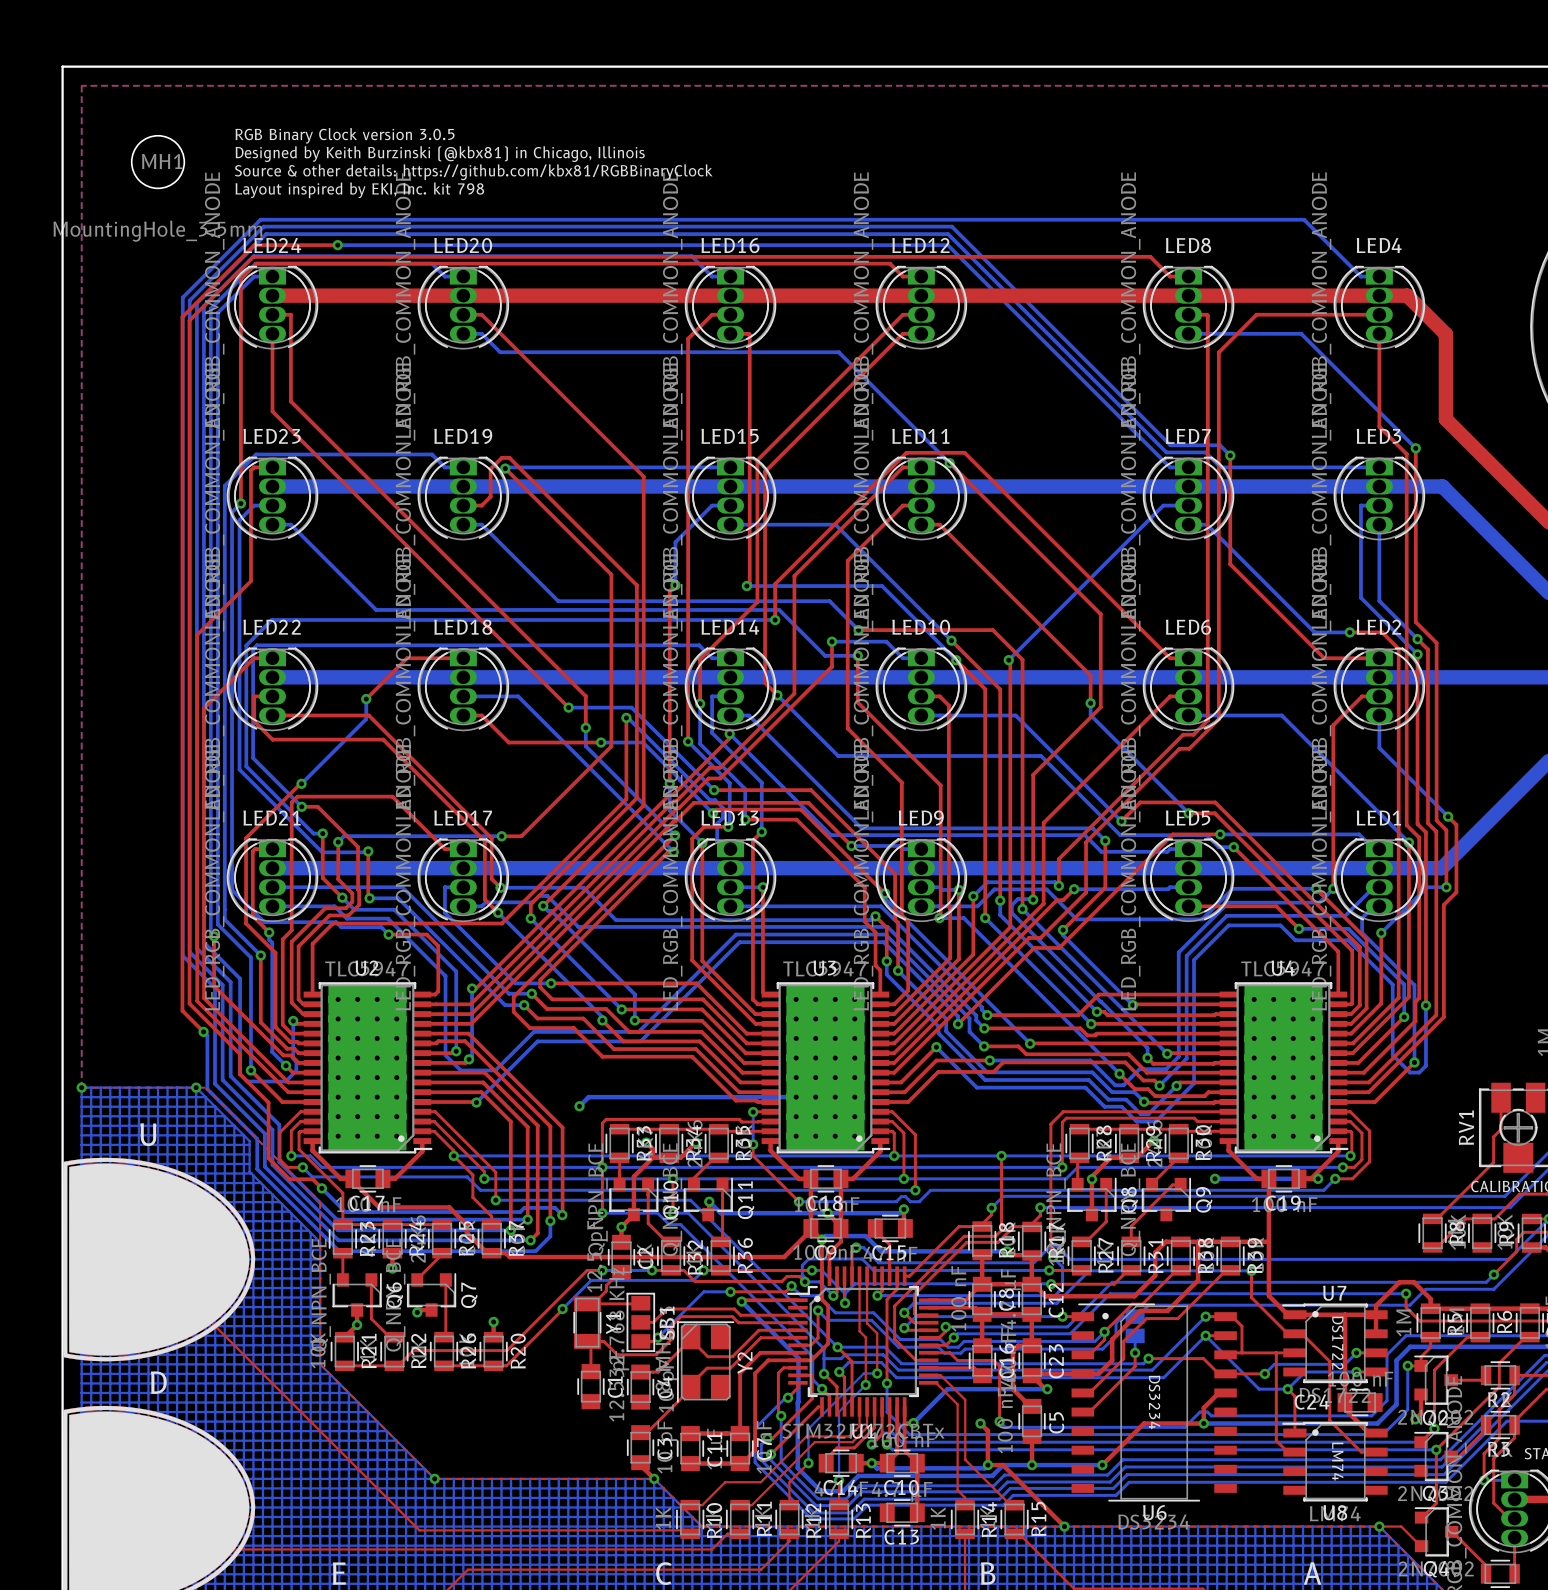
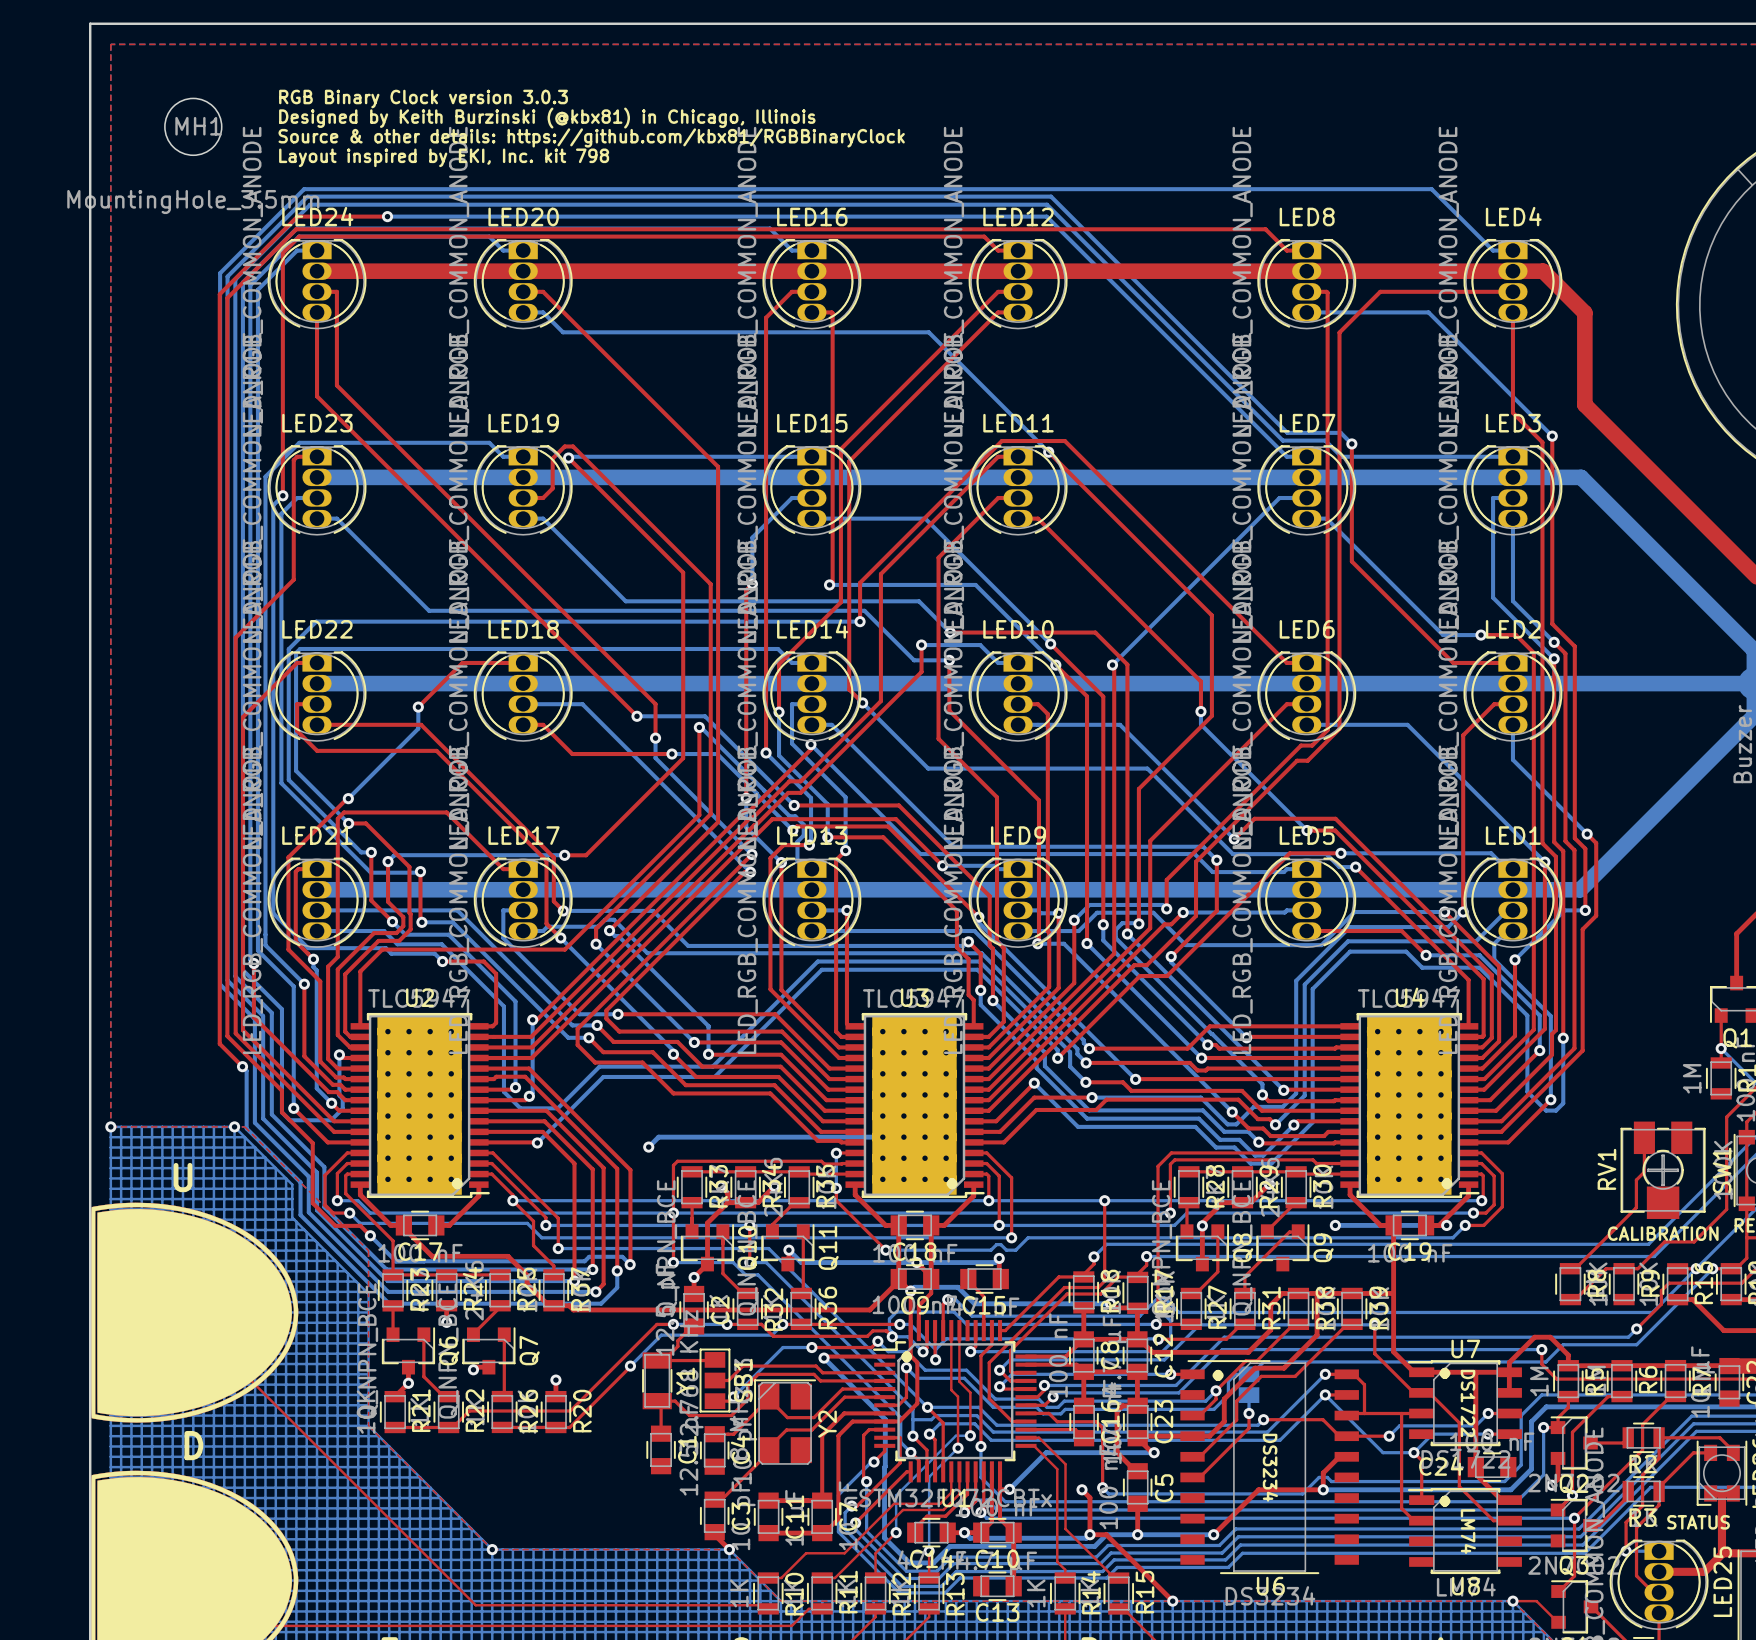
text: RGB Binary Clock version 3.0.5 (345, 135) -> RGB Binary Clock version 3.0.3 (423, 99)

